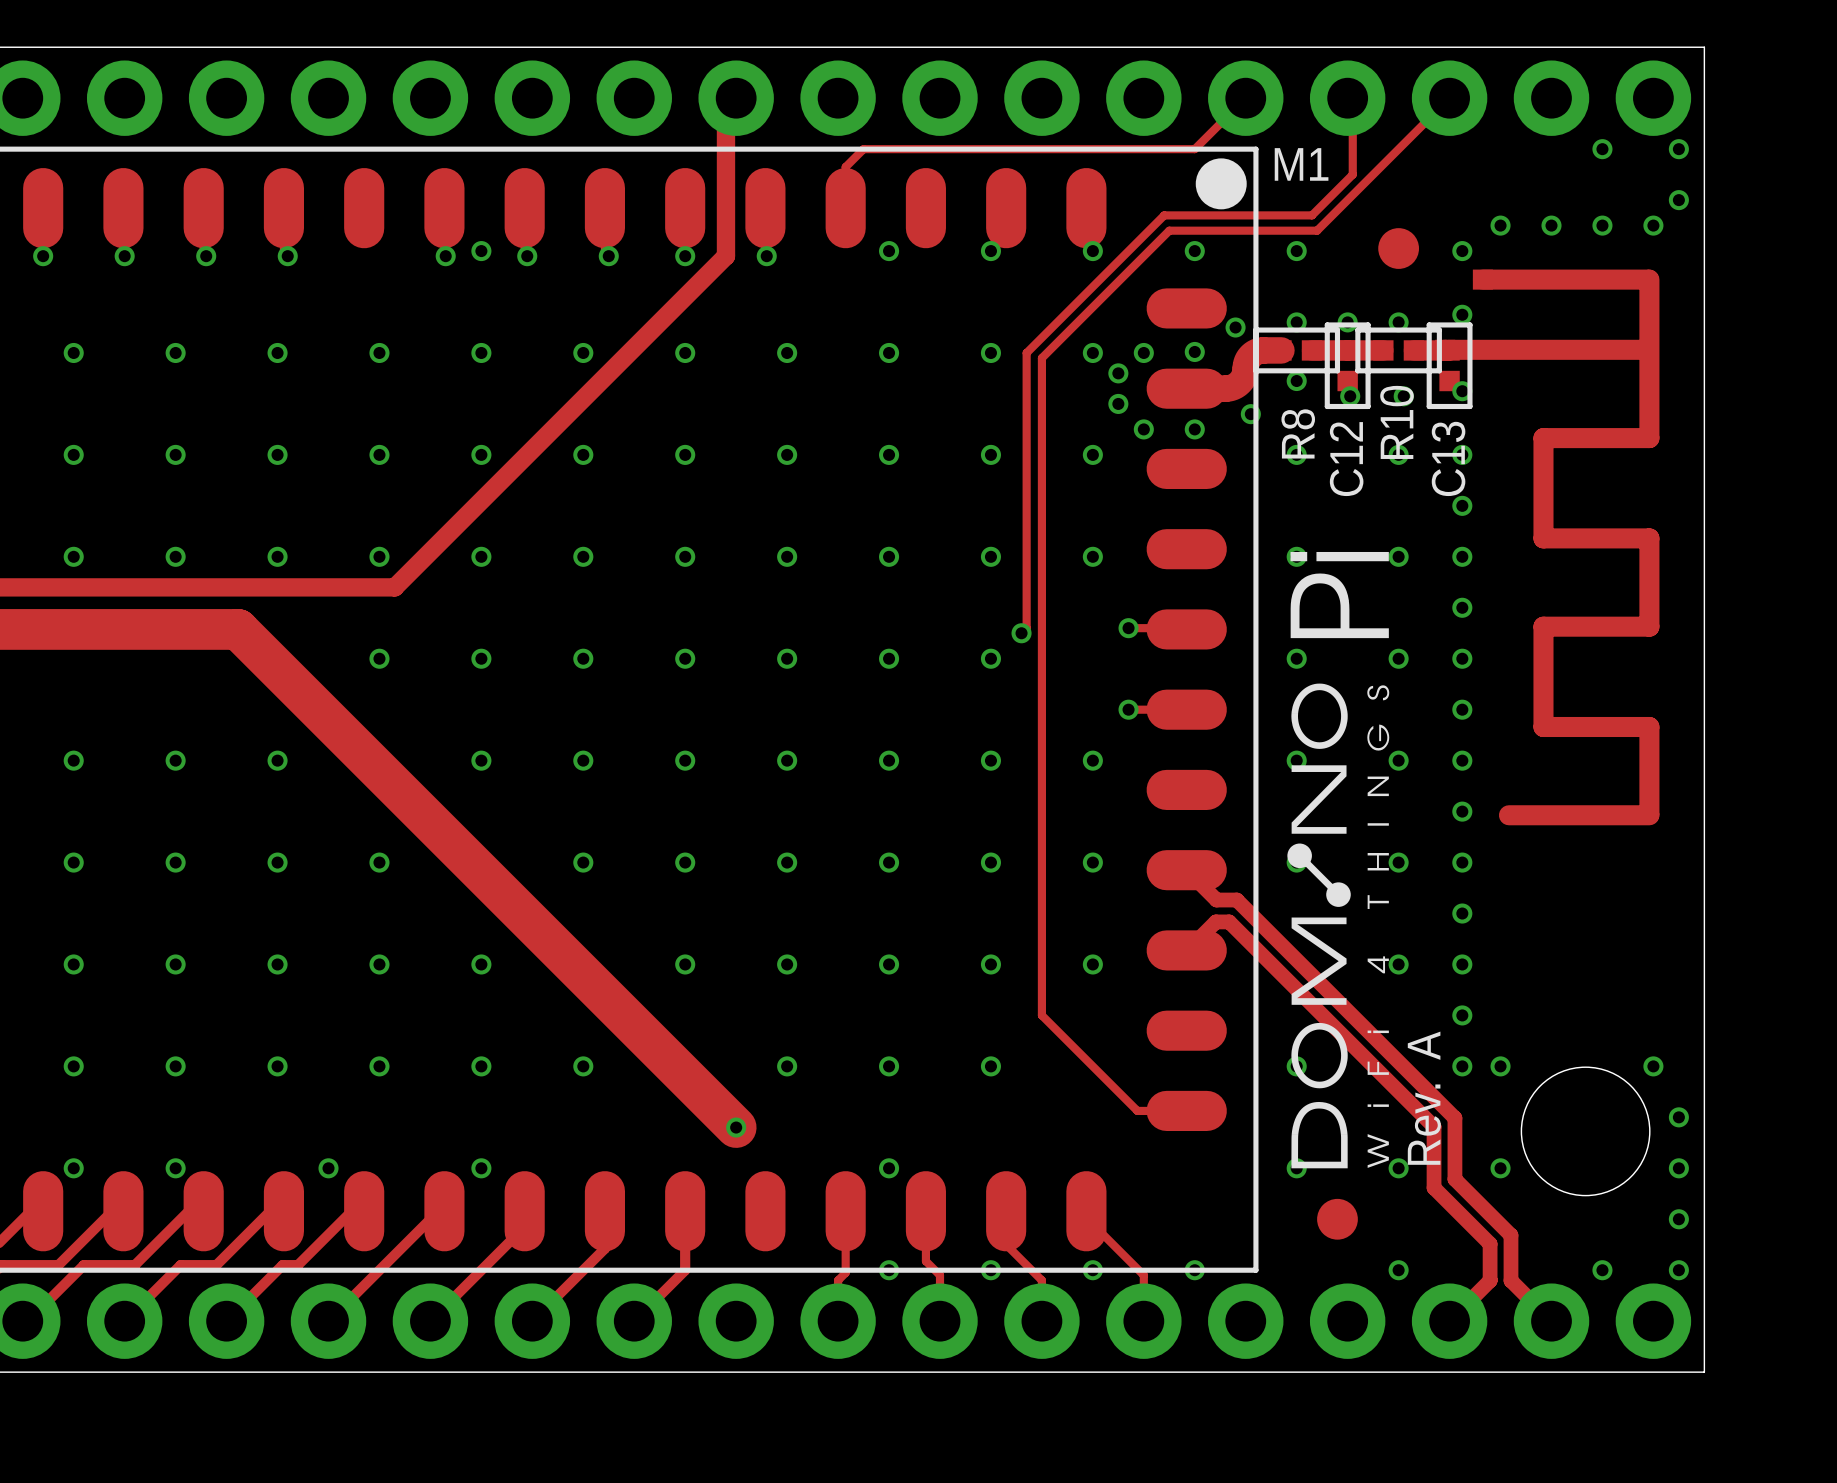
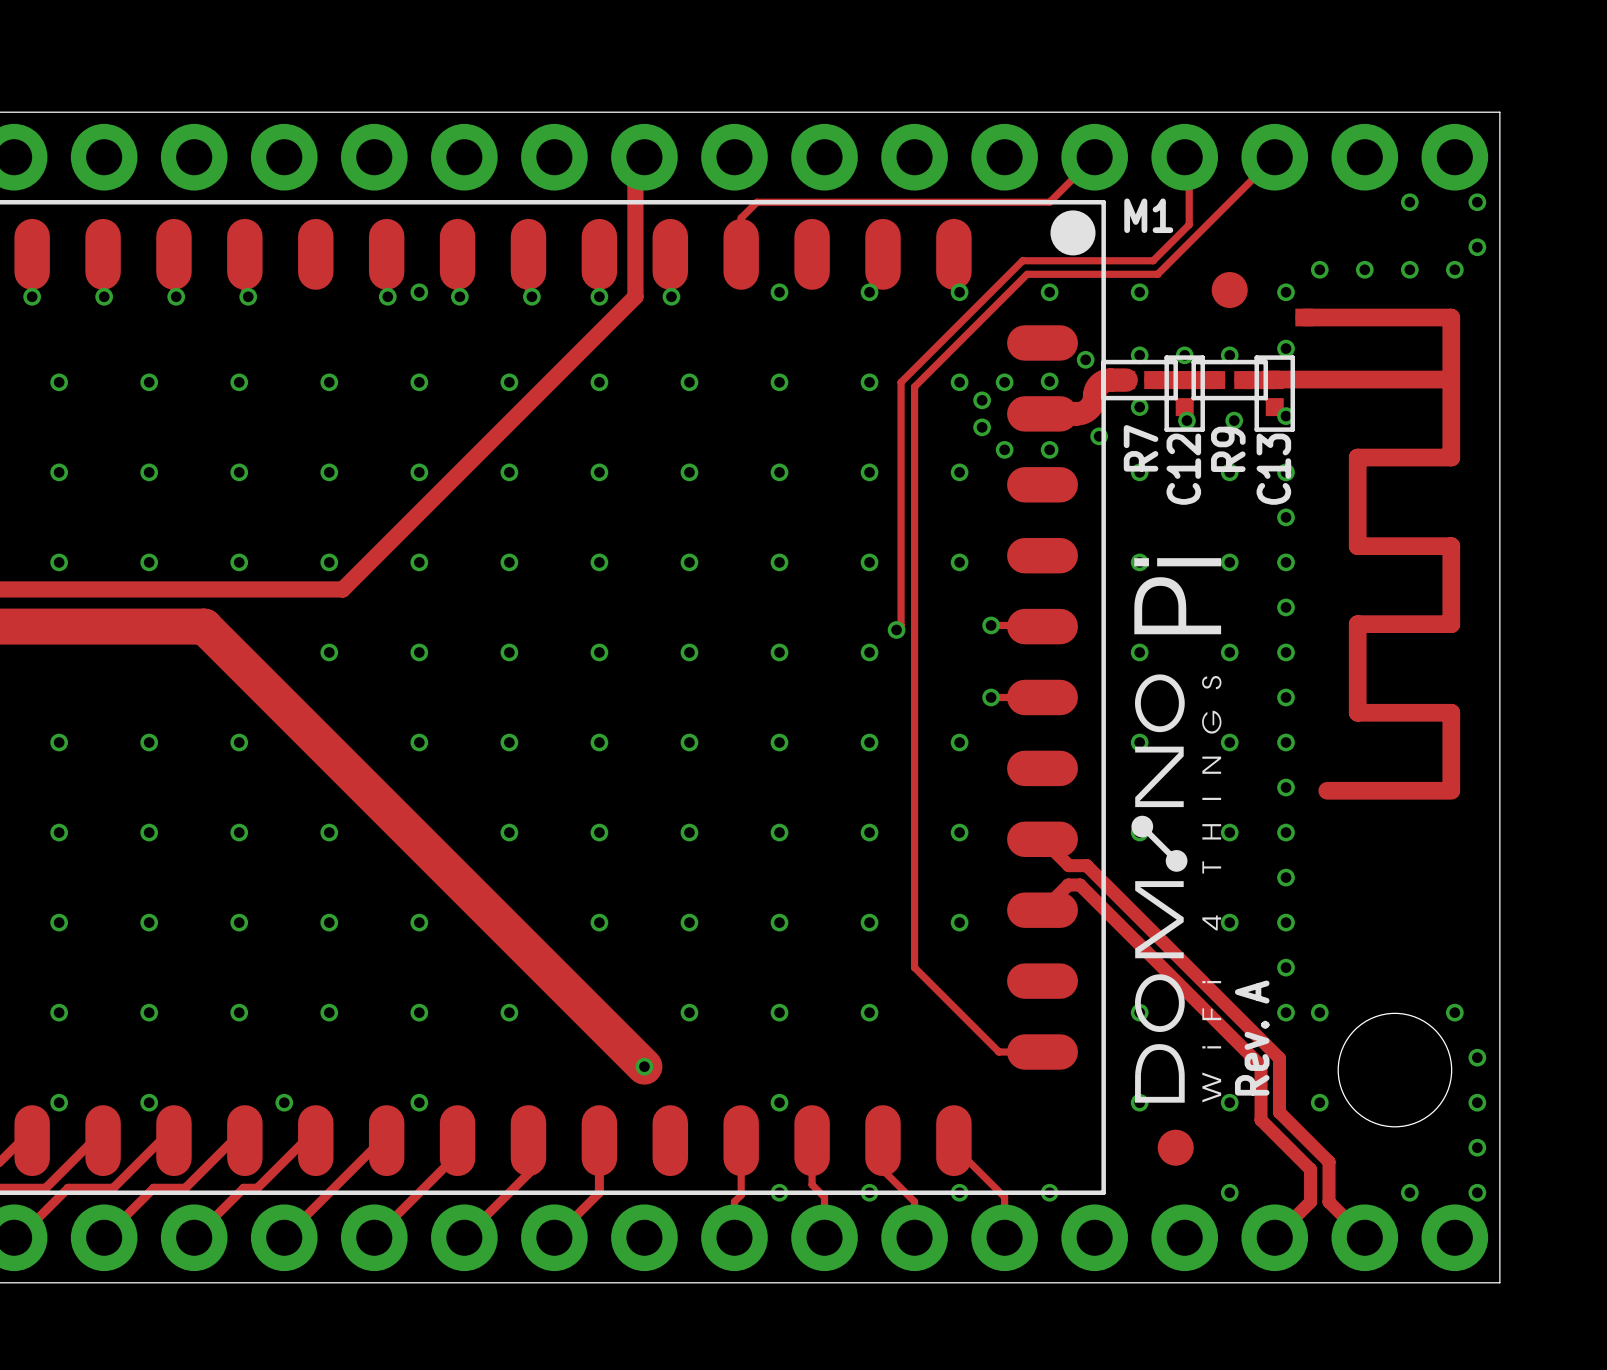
R10 name: R10 (1397, 422) -> R9 (1228, 449)
R8 name: R8 (1298, 433) -> R7 (1141, 448)

